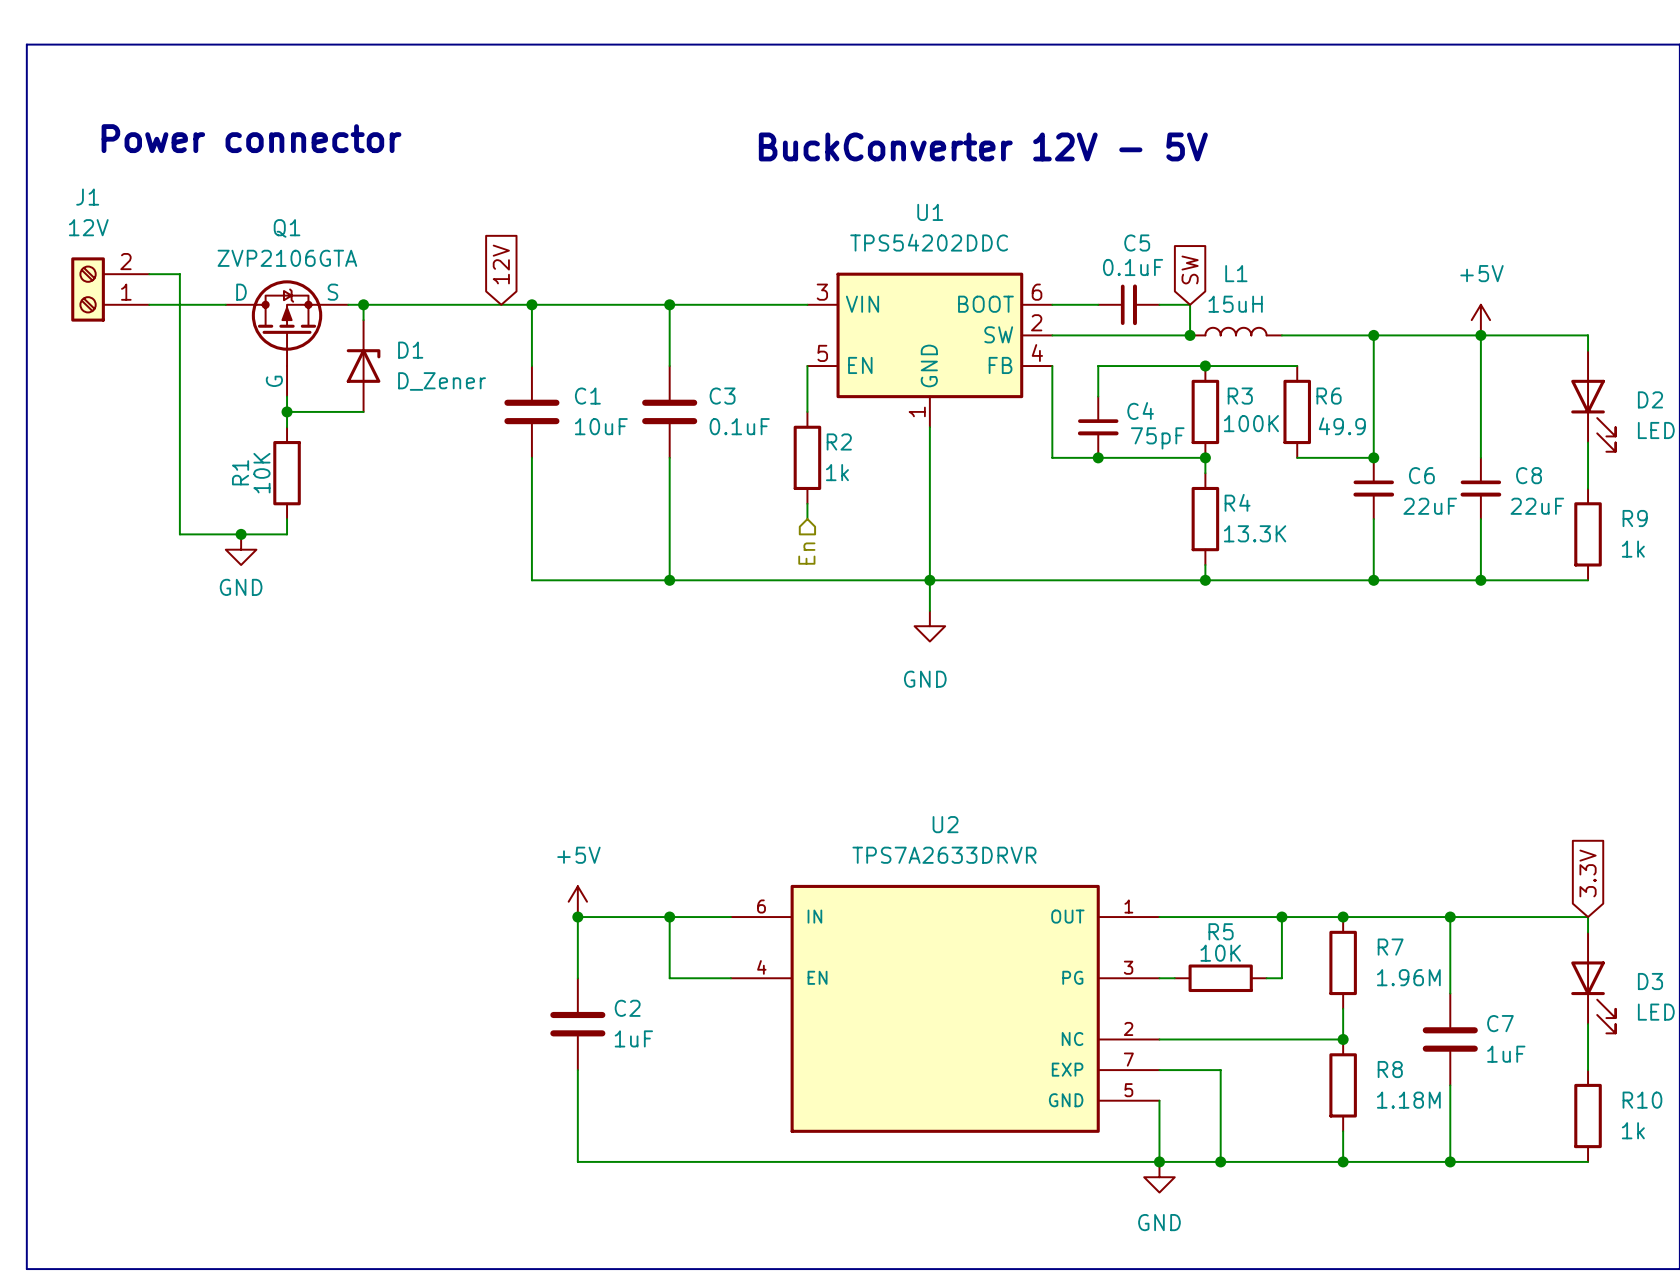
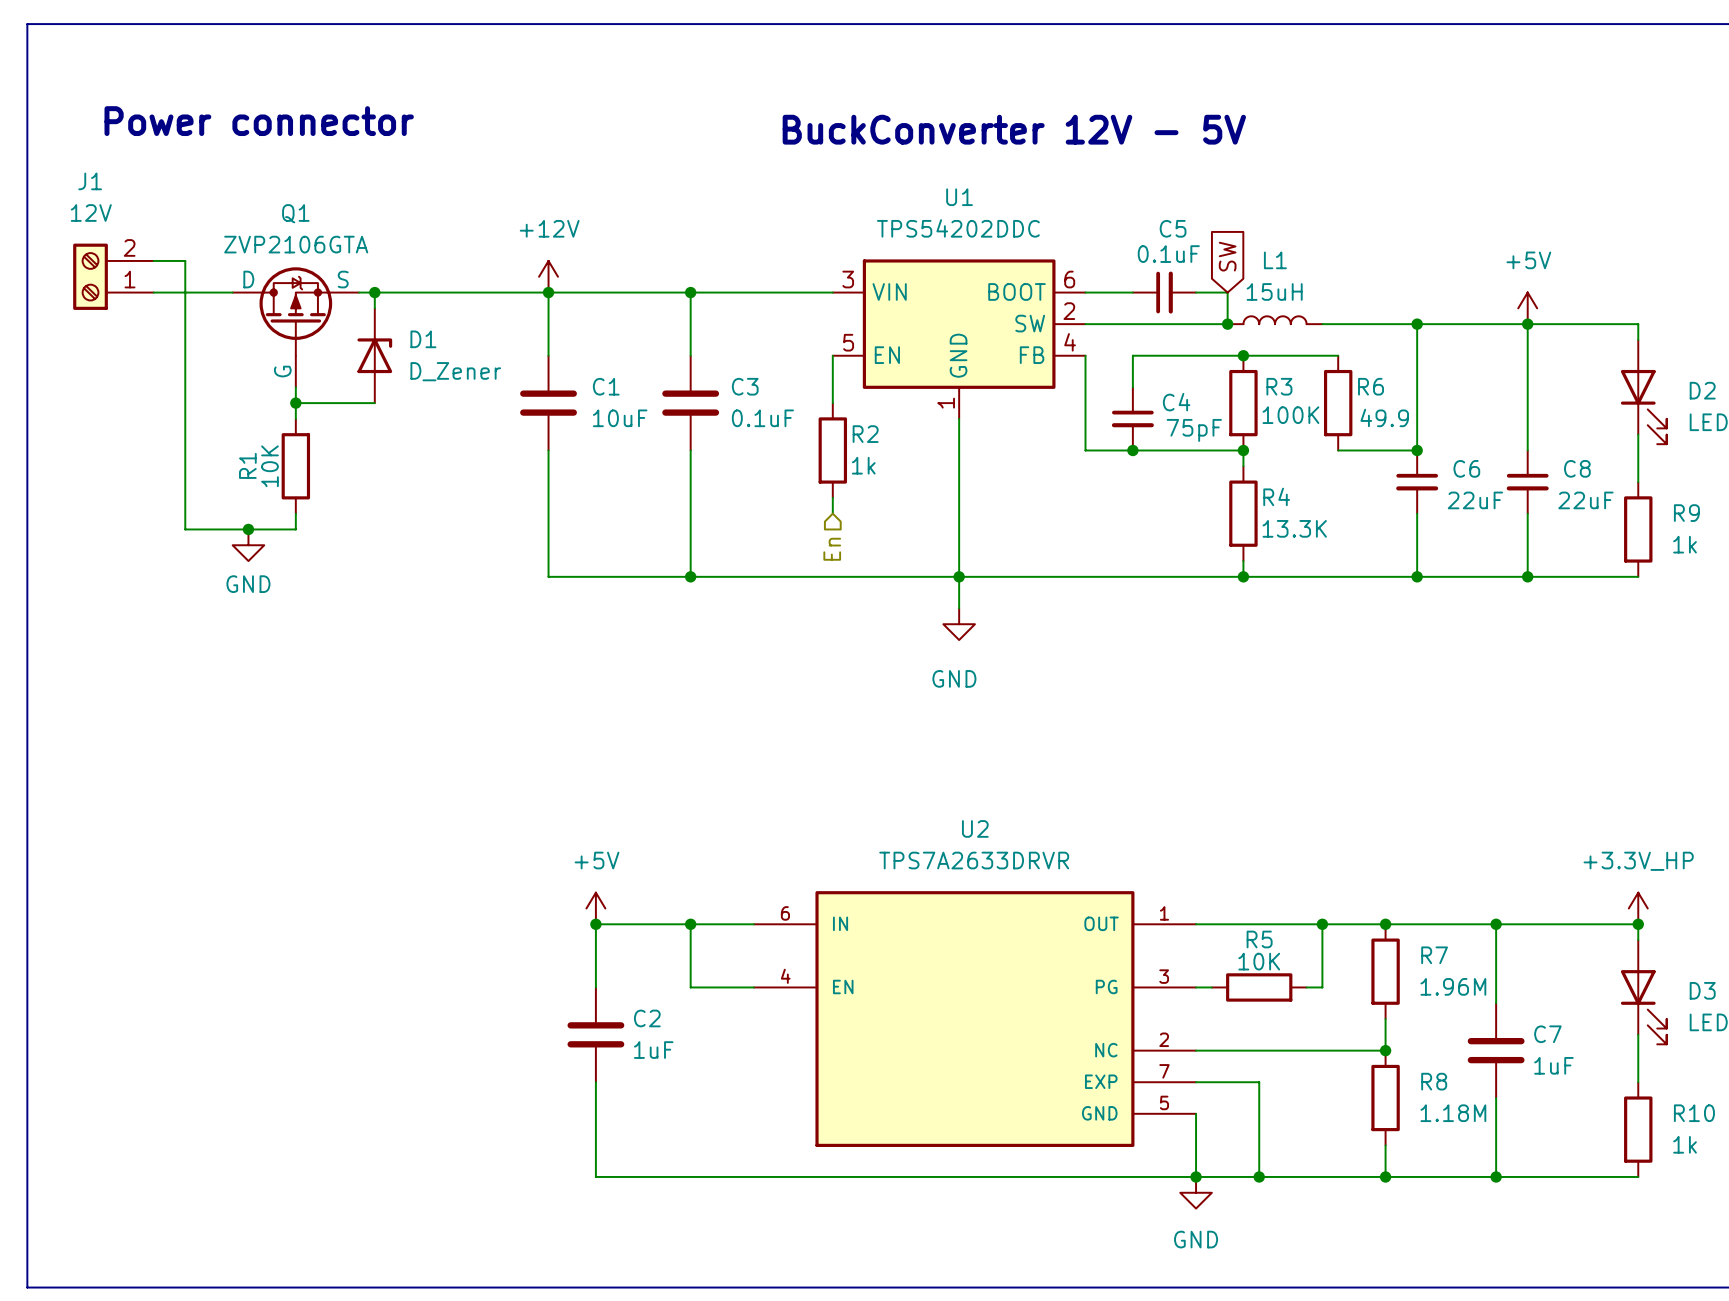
global label: 12V (501, 264) -> none
power symbol: none -> +12V (548, 276)
global label: 3.3V (1588, 873) -> none
power symbol: none -> +3.3V_HP (1638, 908)
junction: none -> (1638, 924)

